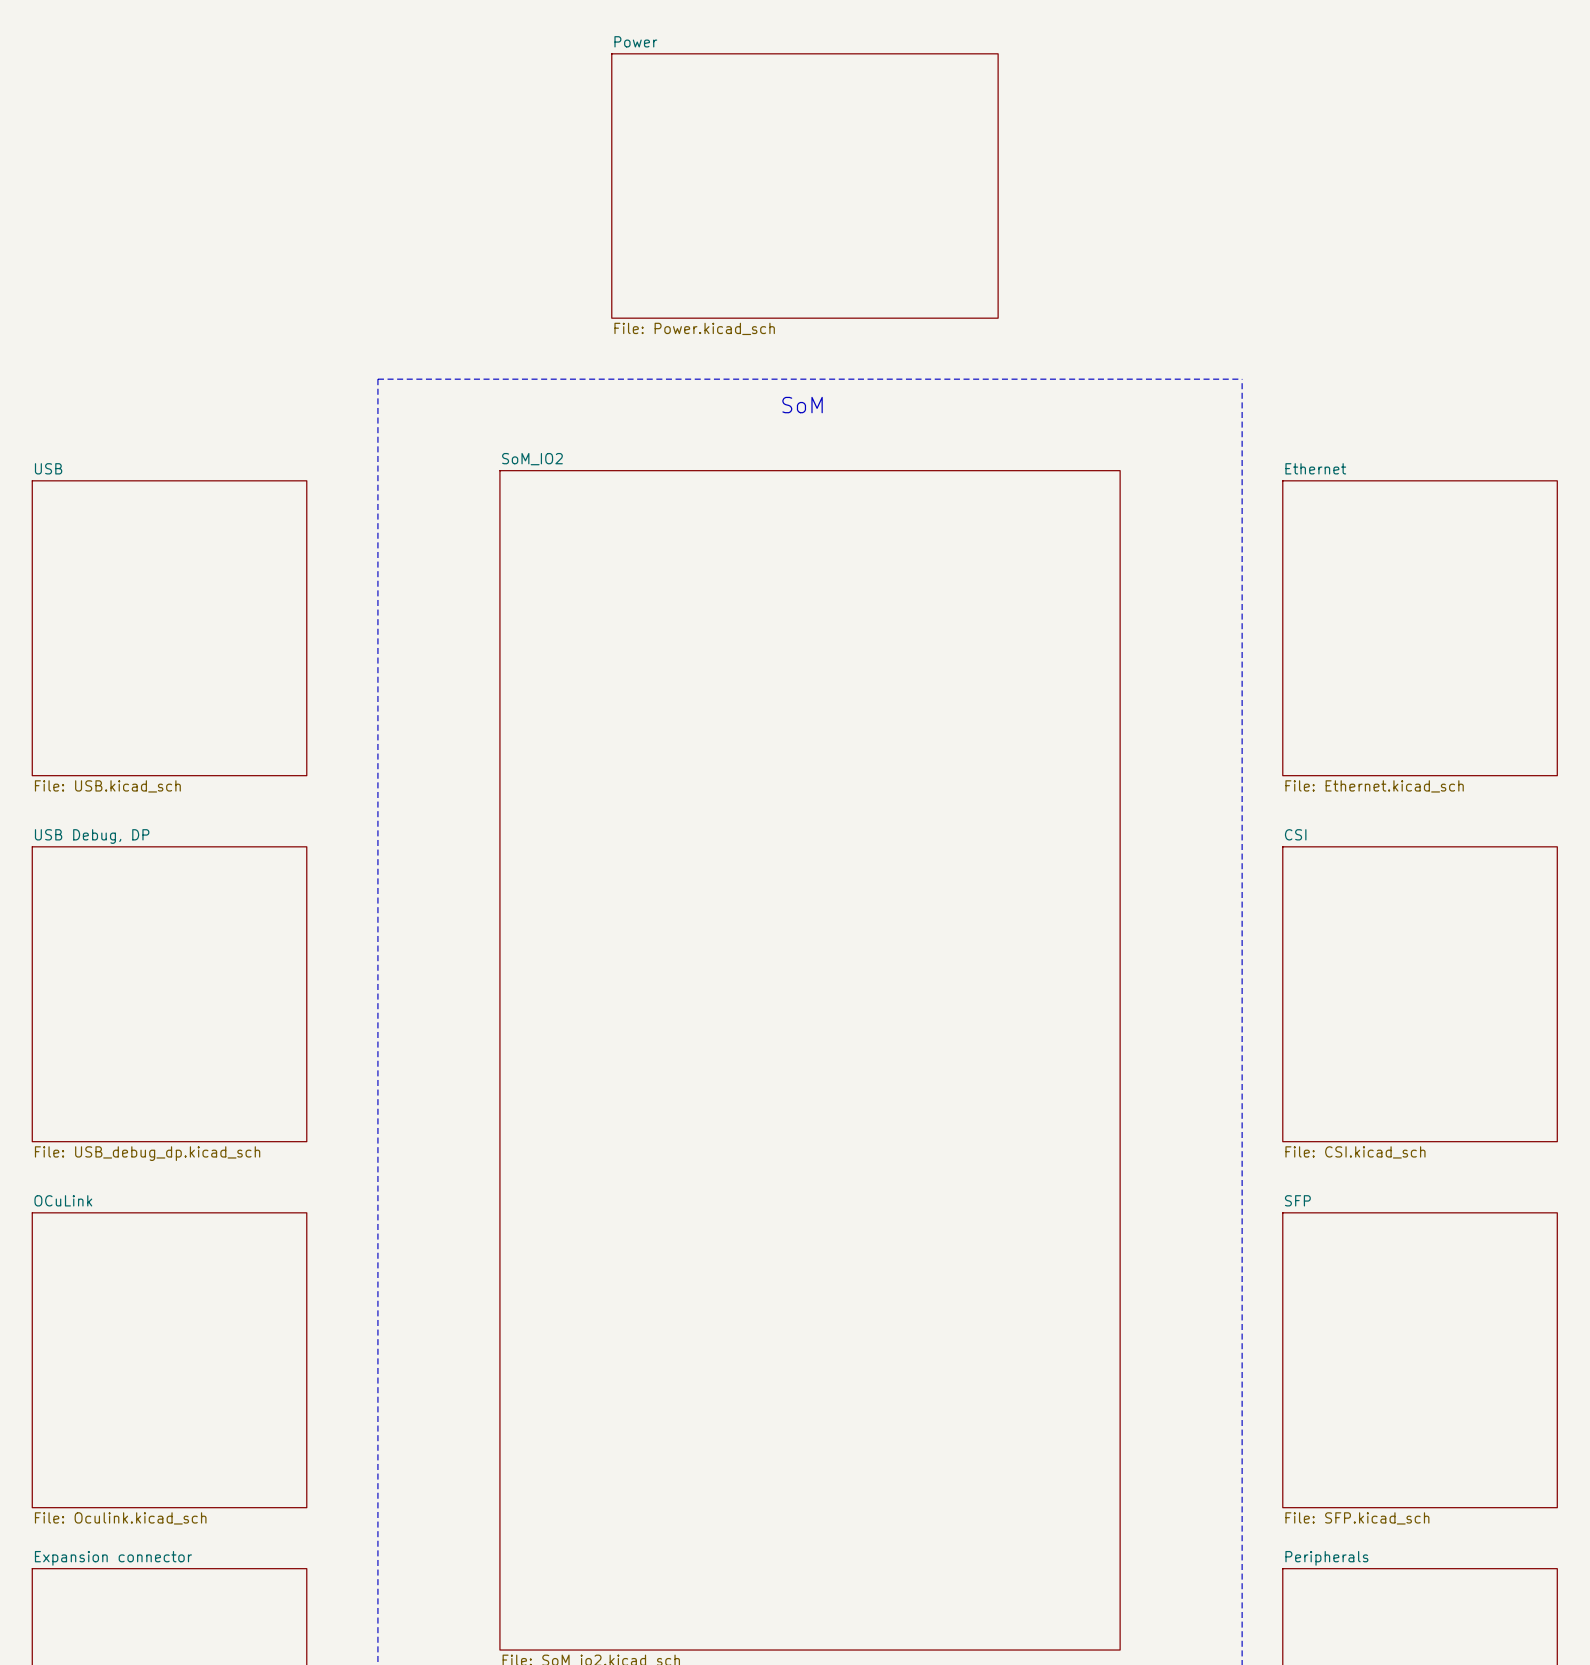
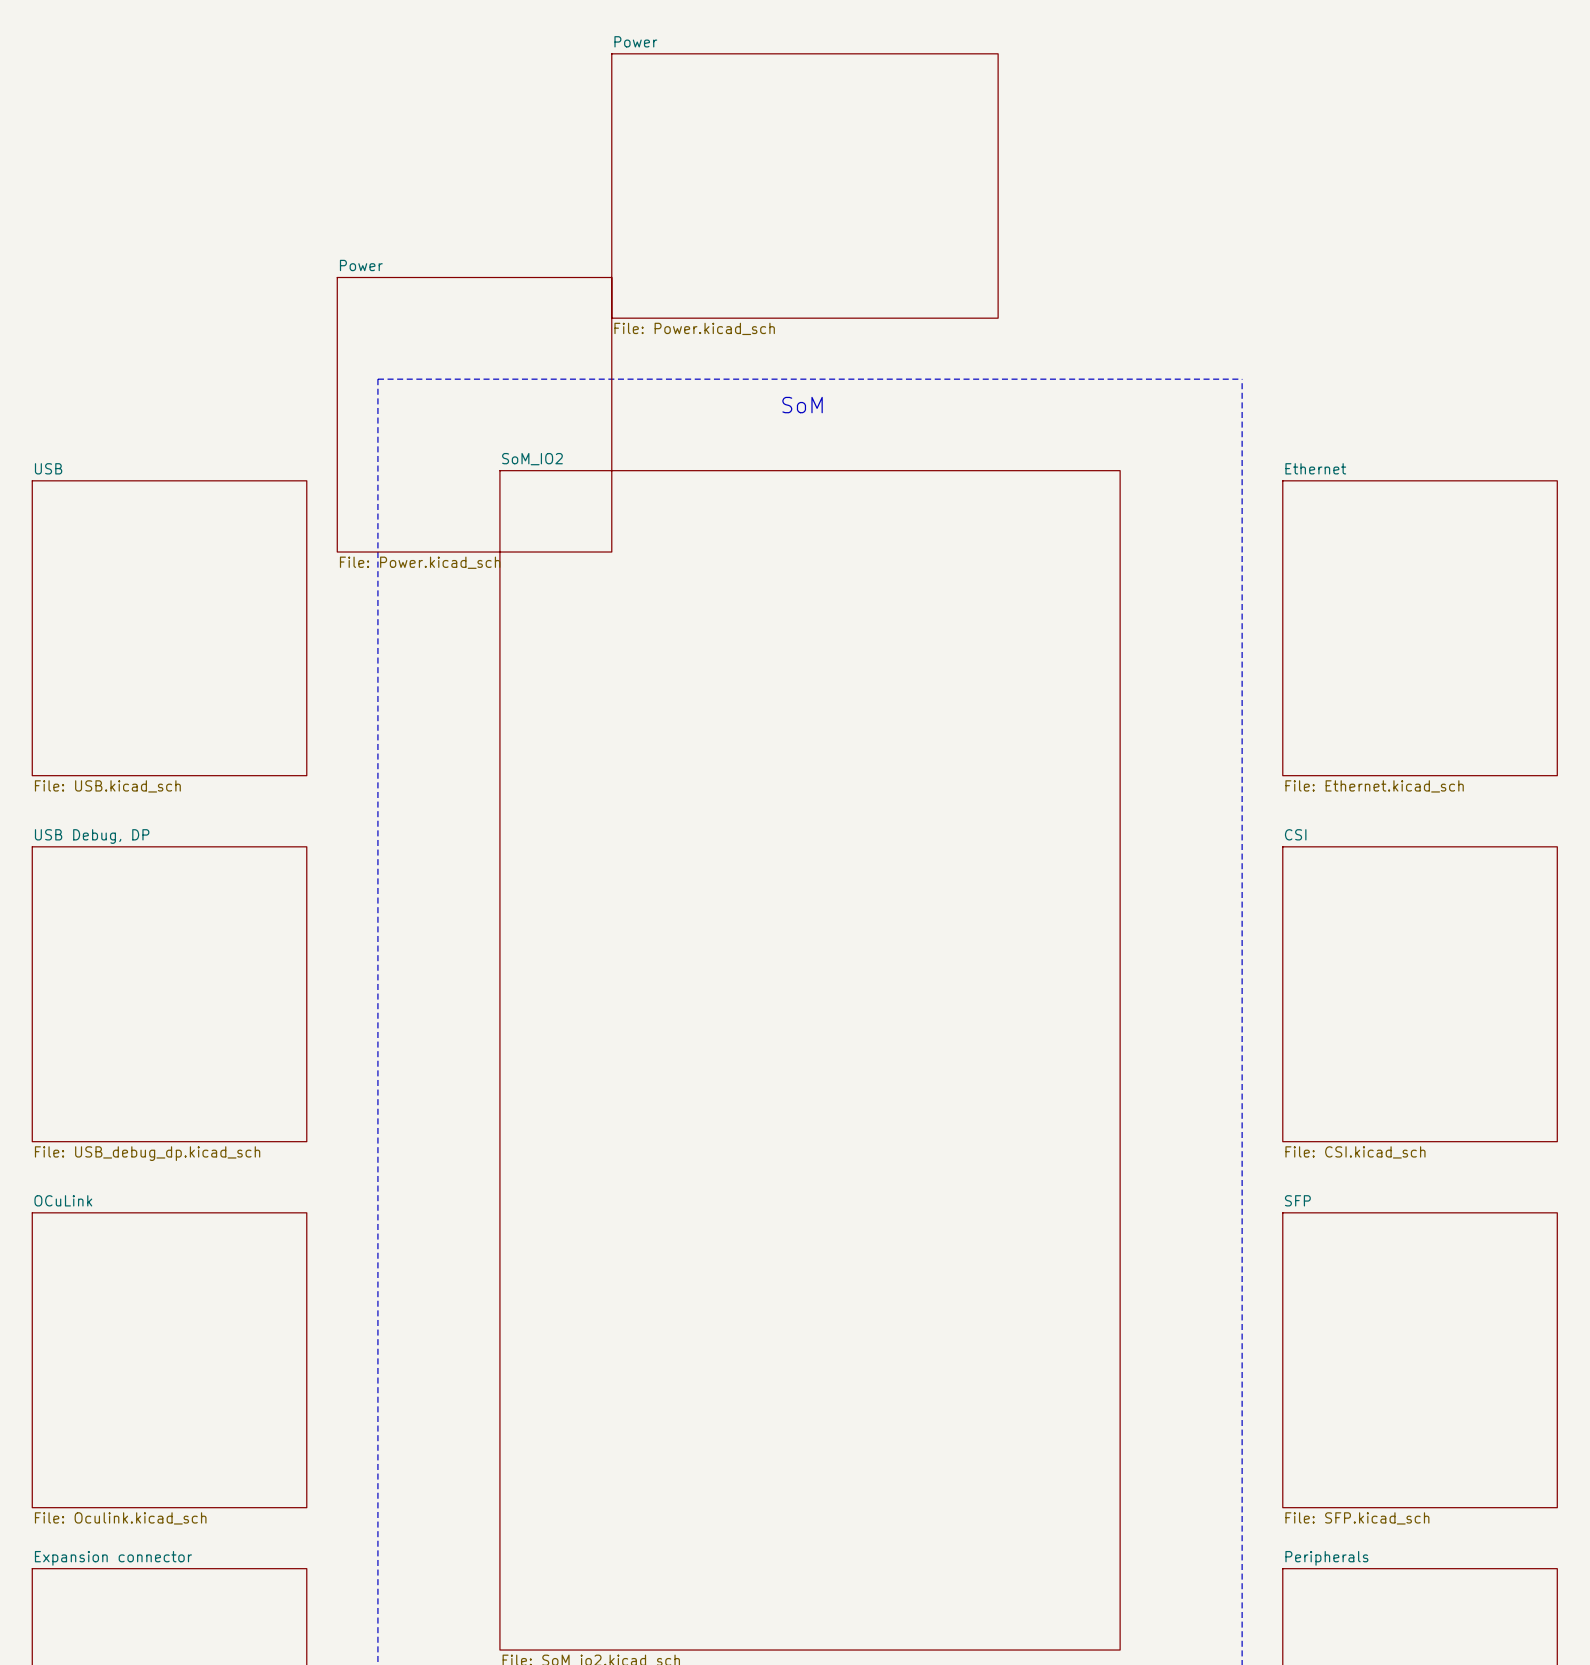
sheet Power: none -> File: Power.kicad_sch (474, 414)

